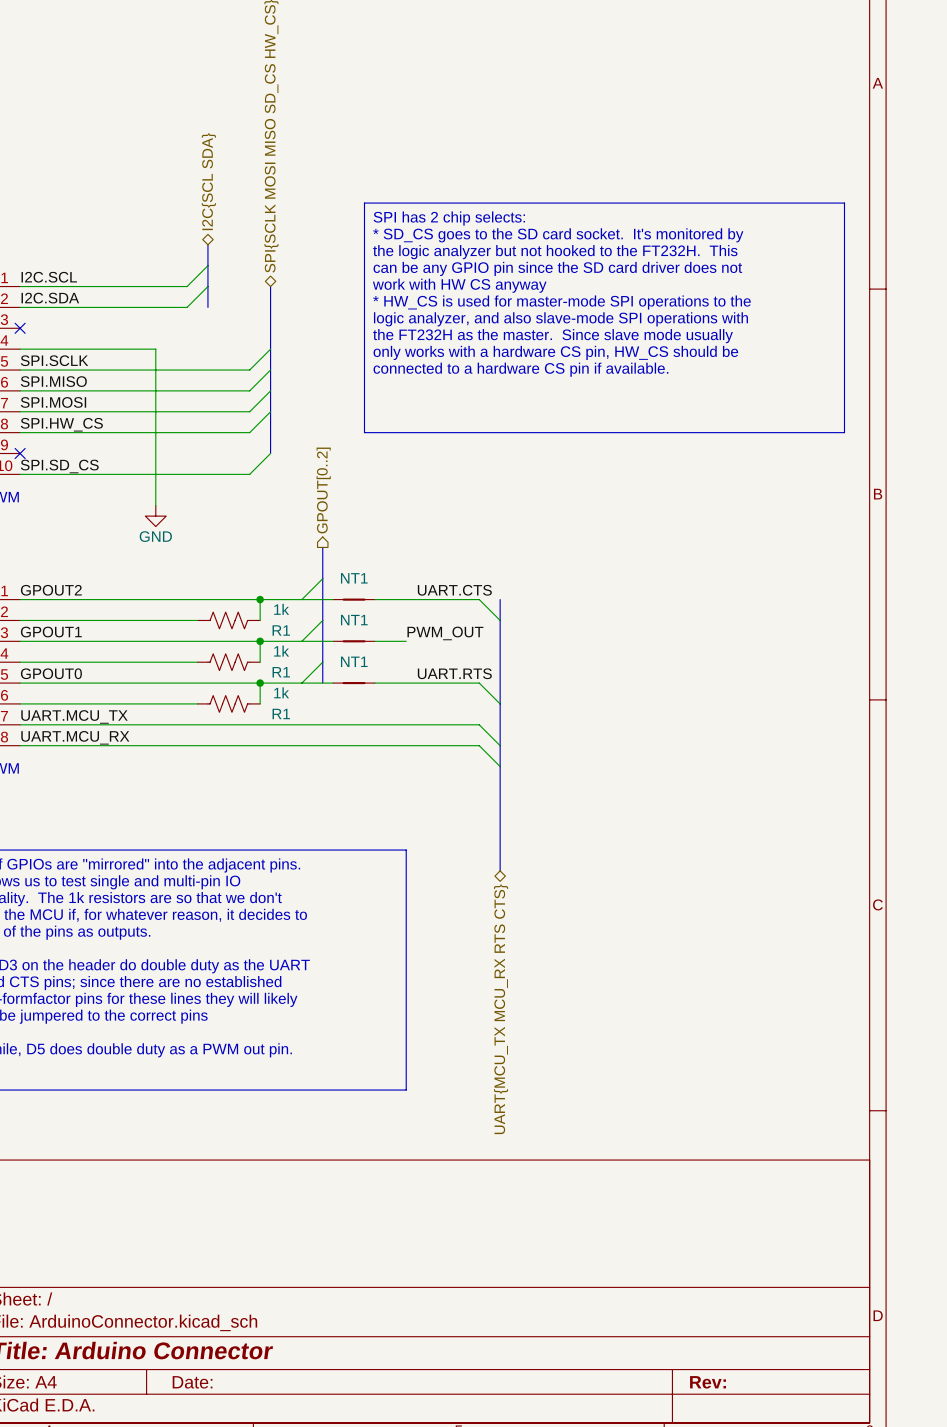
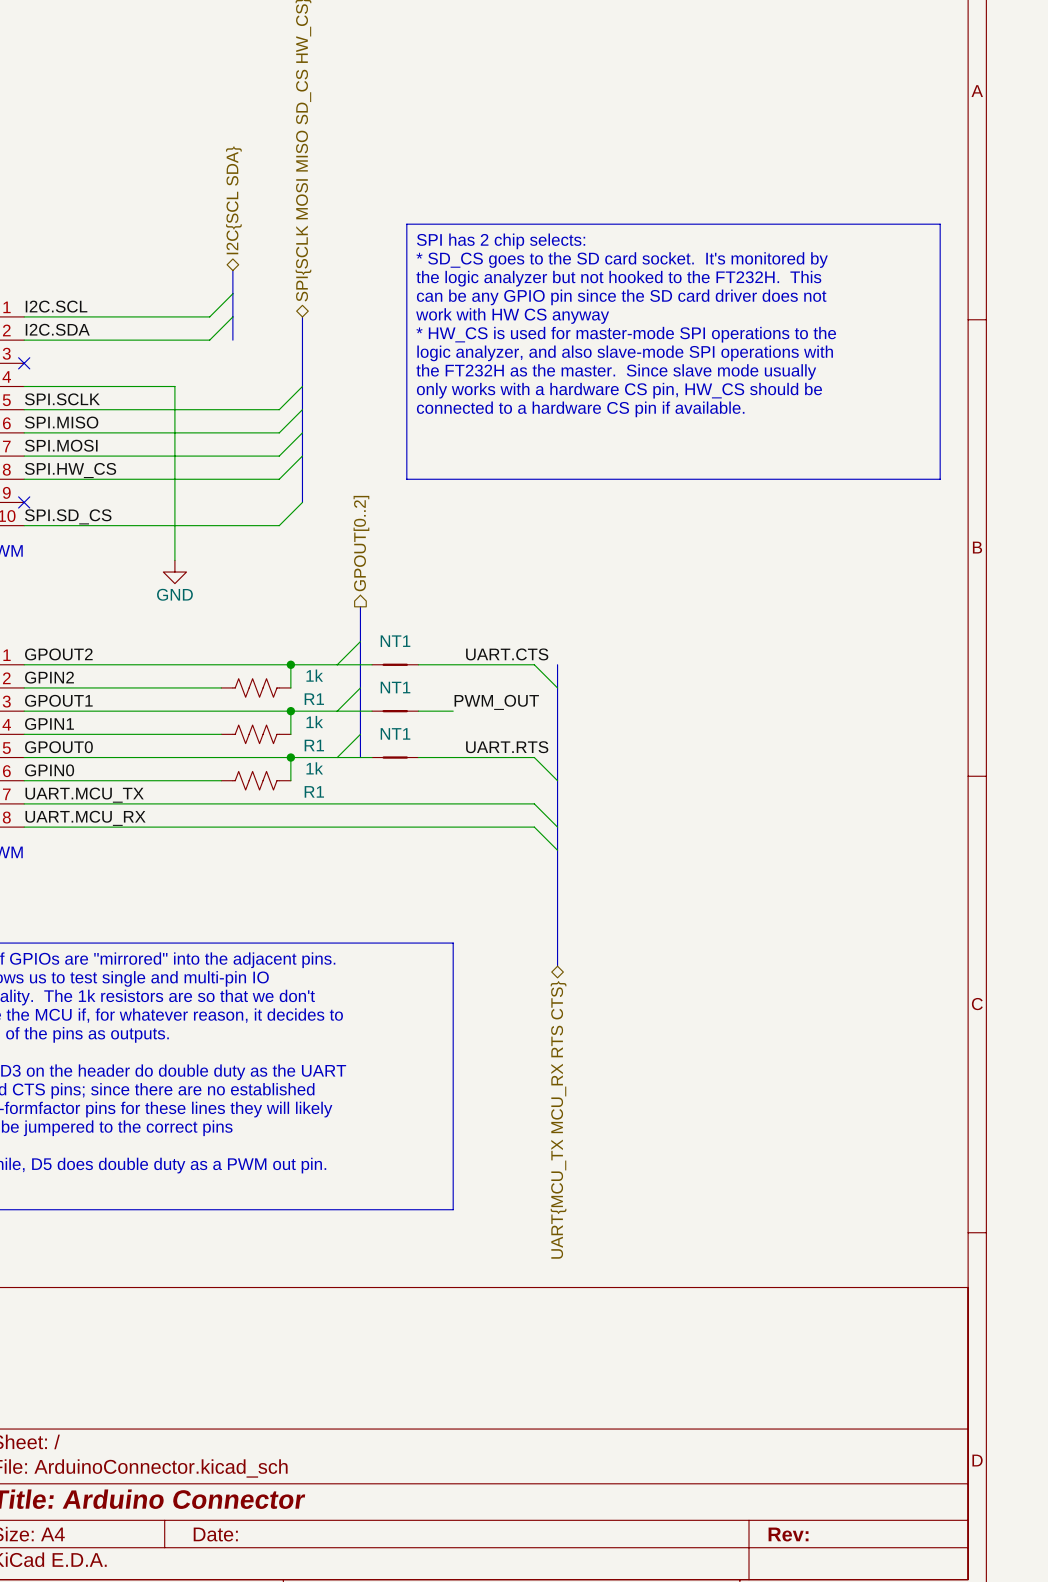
label: none -> GPIN2 (49, 677)
label: none -> GPIN1 (49, 724)
label: none -> GPIN0 (49, 770)

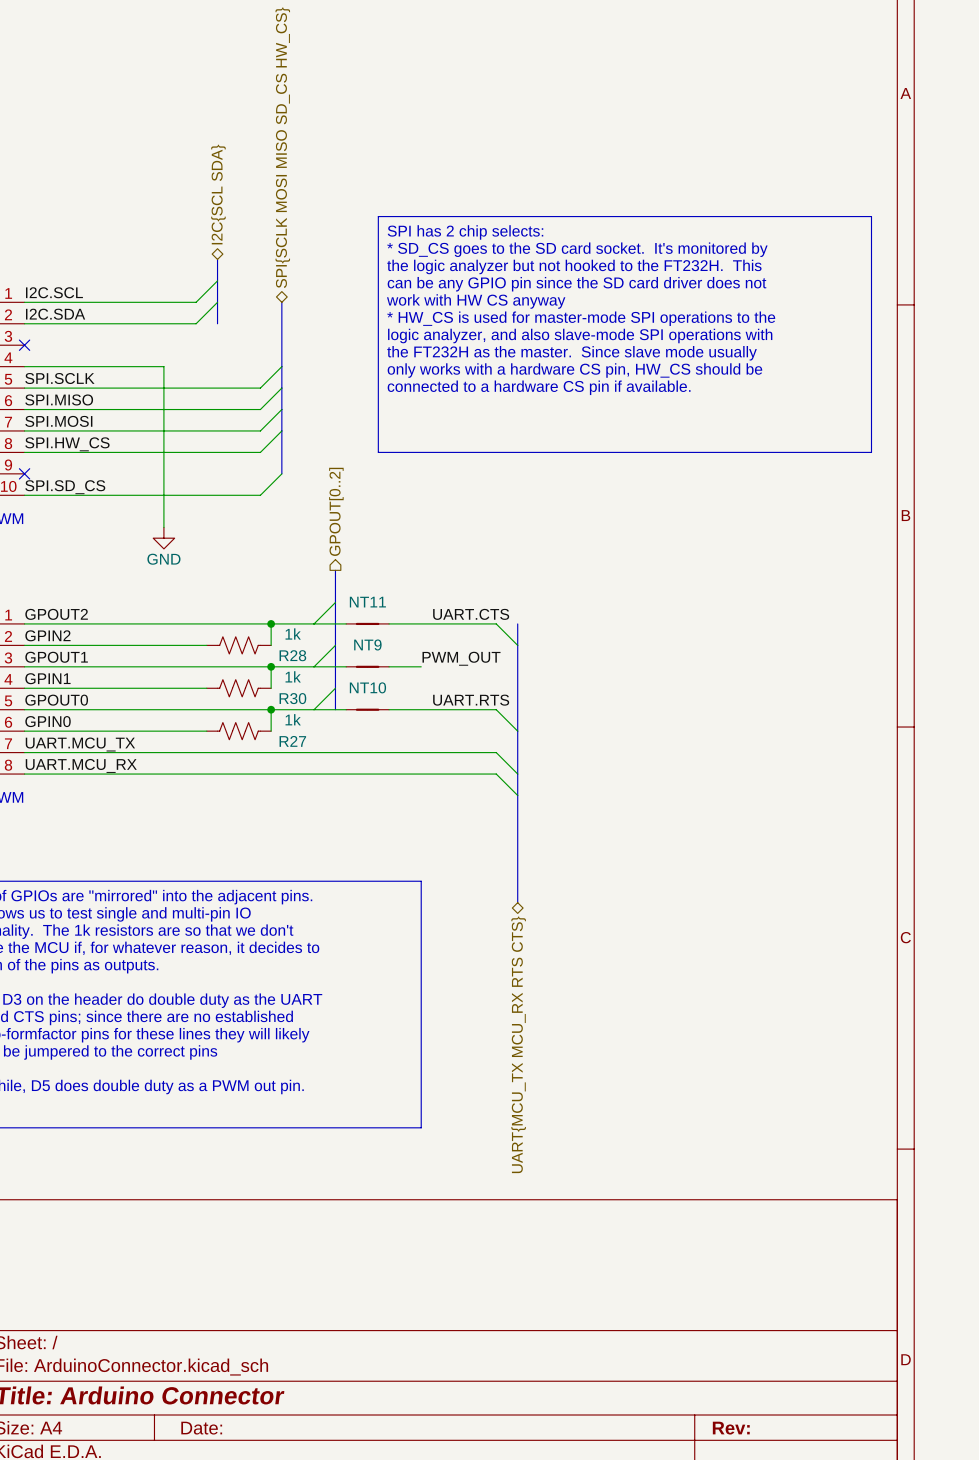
NT1 name: NT1 (395, 641) -> NT11 (367, 602)
NT1 name: NT1 (395, 687) -> NT9 (367, 644)
R1 name: R1 (314, 699) -> R28 (292, 655)
NT1 name: NT1 (395, 733) -> NT10 (367, 687)
R1 name: R1 (314, 745) -> R30 (292, 698)
R1 name: R1 (314, 791) -> R27 (292, 741)

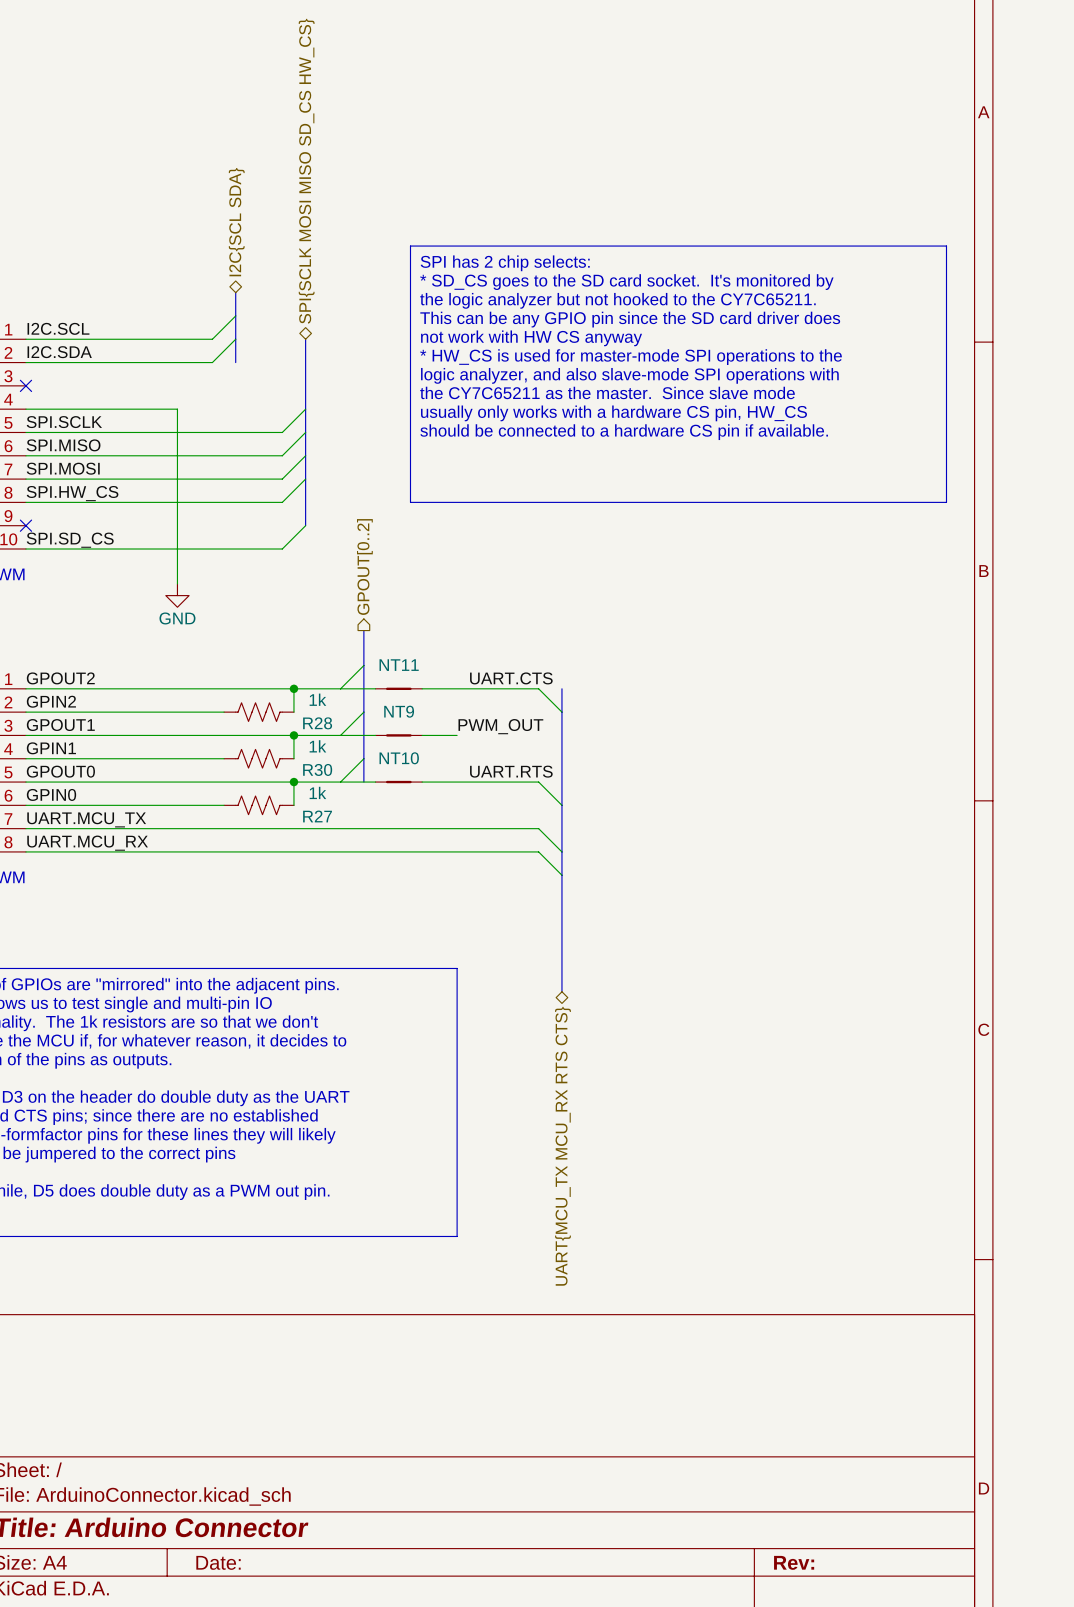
text: the logic analyzer but not hooked to the FT232H. This (574, 266) -> the logic analyzer but not hooked to the CY7C65211. (617, 300)
text: can be any GPIO pin since the SD card driver does not (576, 284) -> This can be any GPIO pin since the SD card driver does (630, 319)
text: work with HW CS anyway (476, 301) -> not work with HW CS anyway (531, 338)
text: the FT232H as the master. Since slave mode usually (572, 353) -> the CY7C65211 as the master. Since slave mode (607, 392)
text: only works with a hardware CS pin, HW_CS should be (574, 370) -> usually only works with a hardware CS pin, HW_CS (614, 413)
text: connected to a hardware CS pin if available. (539, 387) -> should be connected to a hardware CS pin if available. (624, 432)

